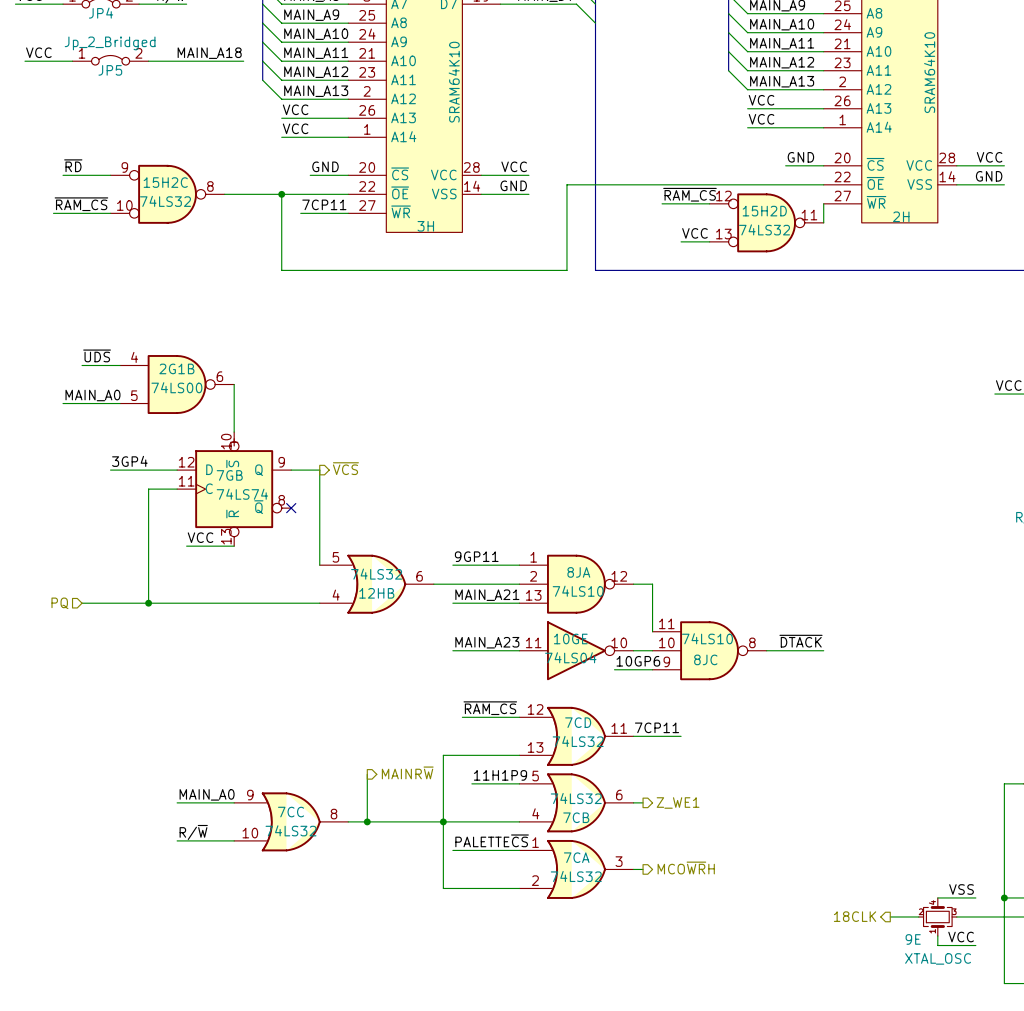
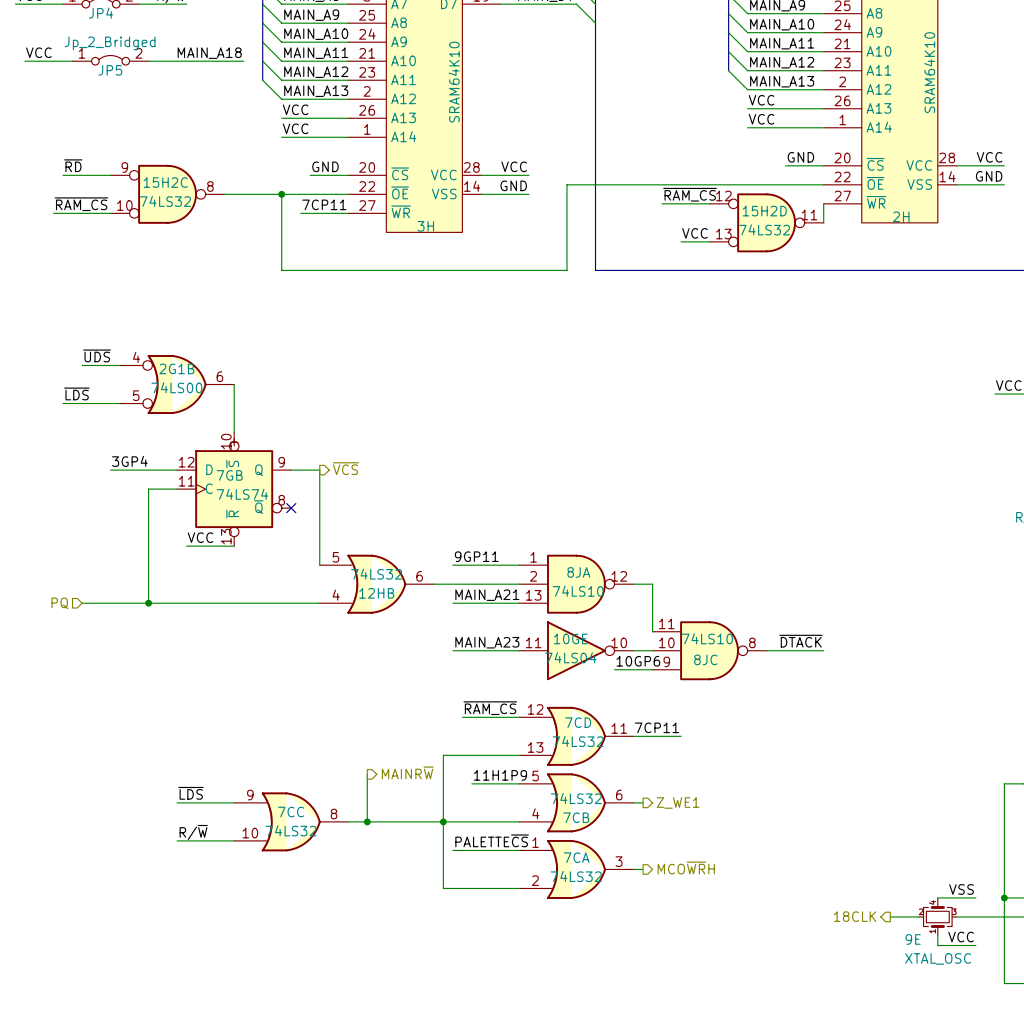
2G1B symbol: [120, 355, 235, 414] -> [120, 355, 235, 414]
label: MAIN_A0 (92, 395) -> ~{LDS} (76, 393)
label: MAIN_A0 (207, 794) -> ~{LDS} (191, 793)

